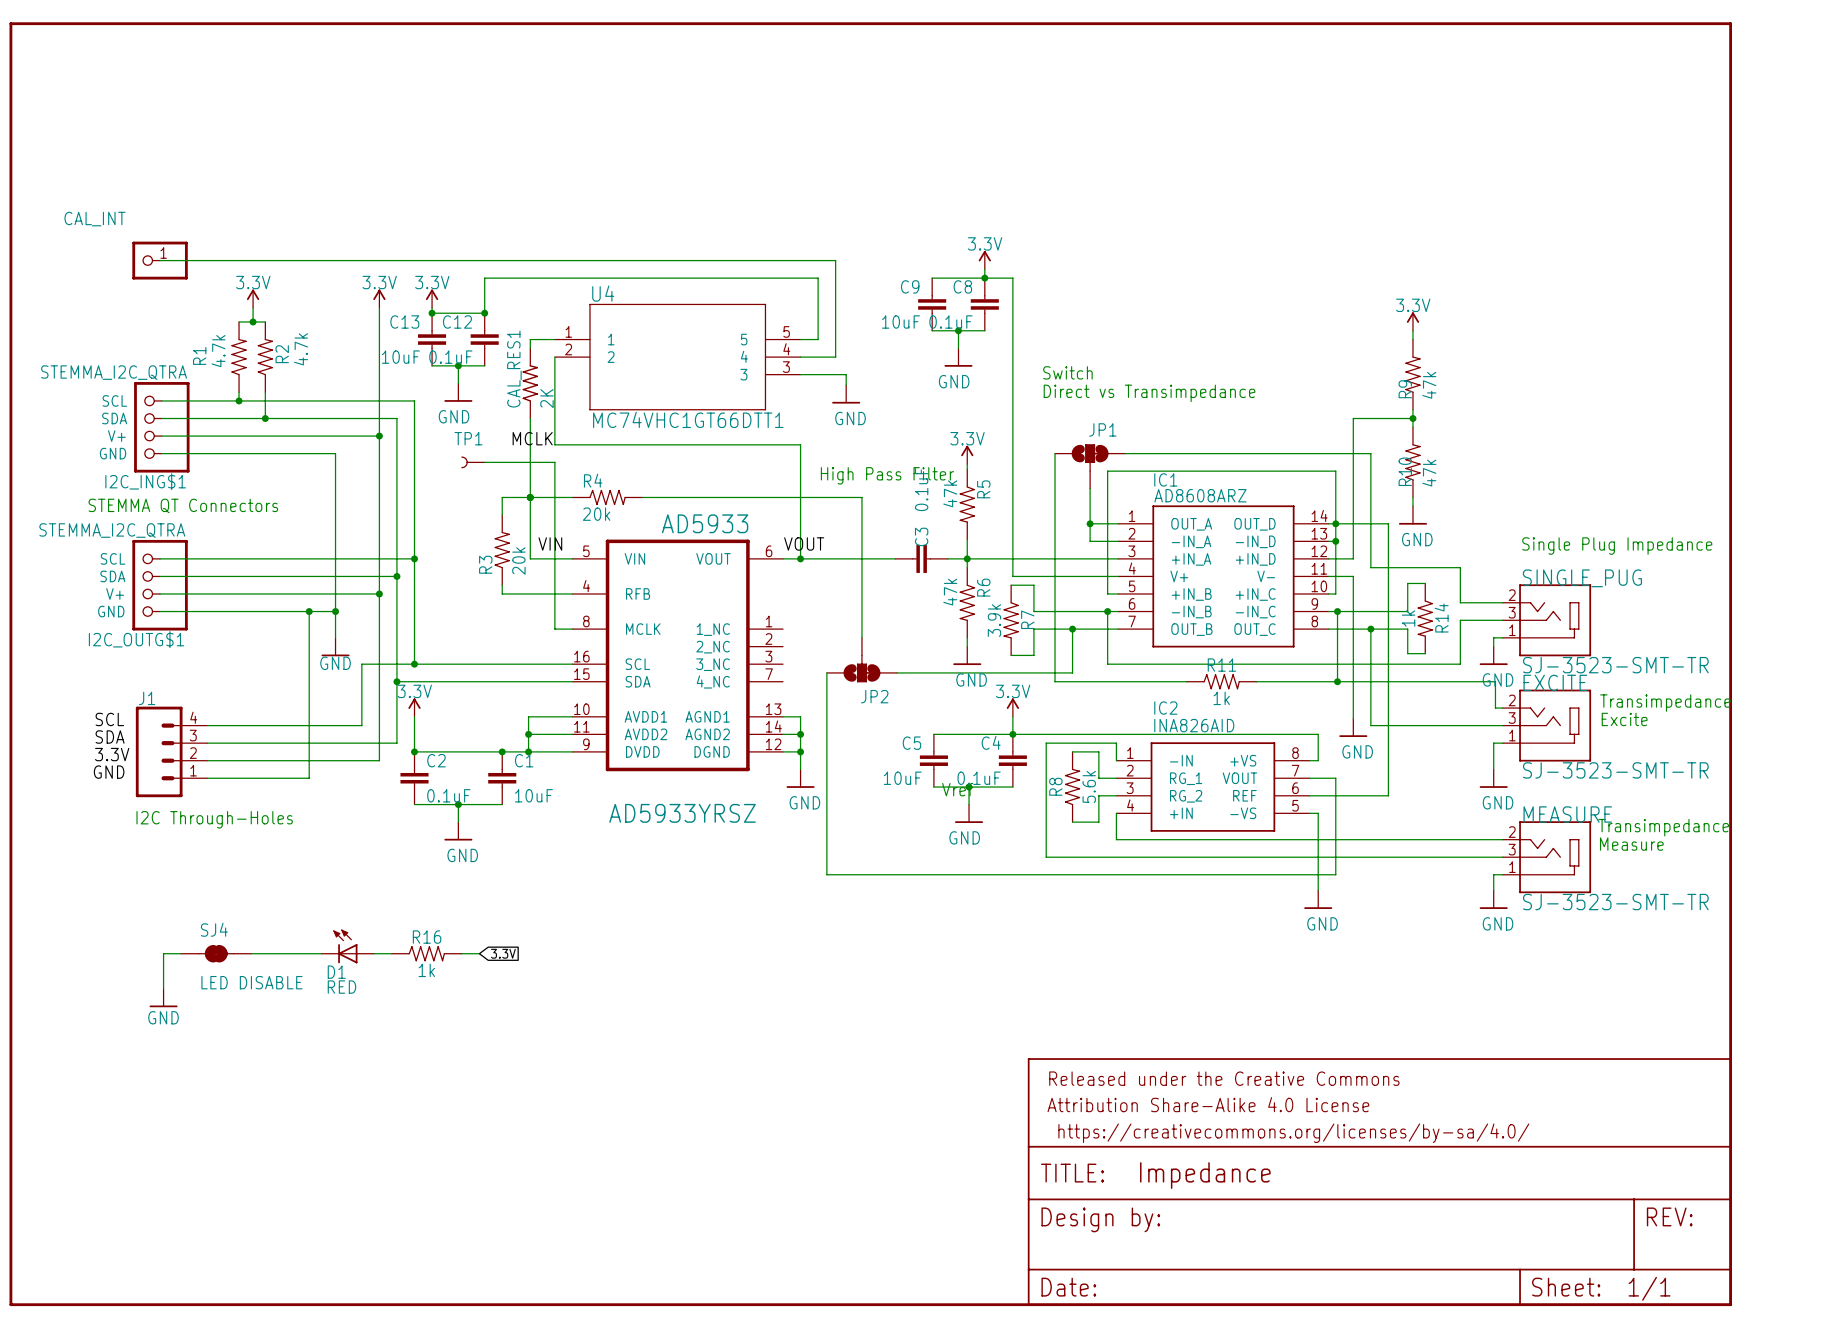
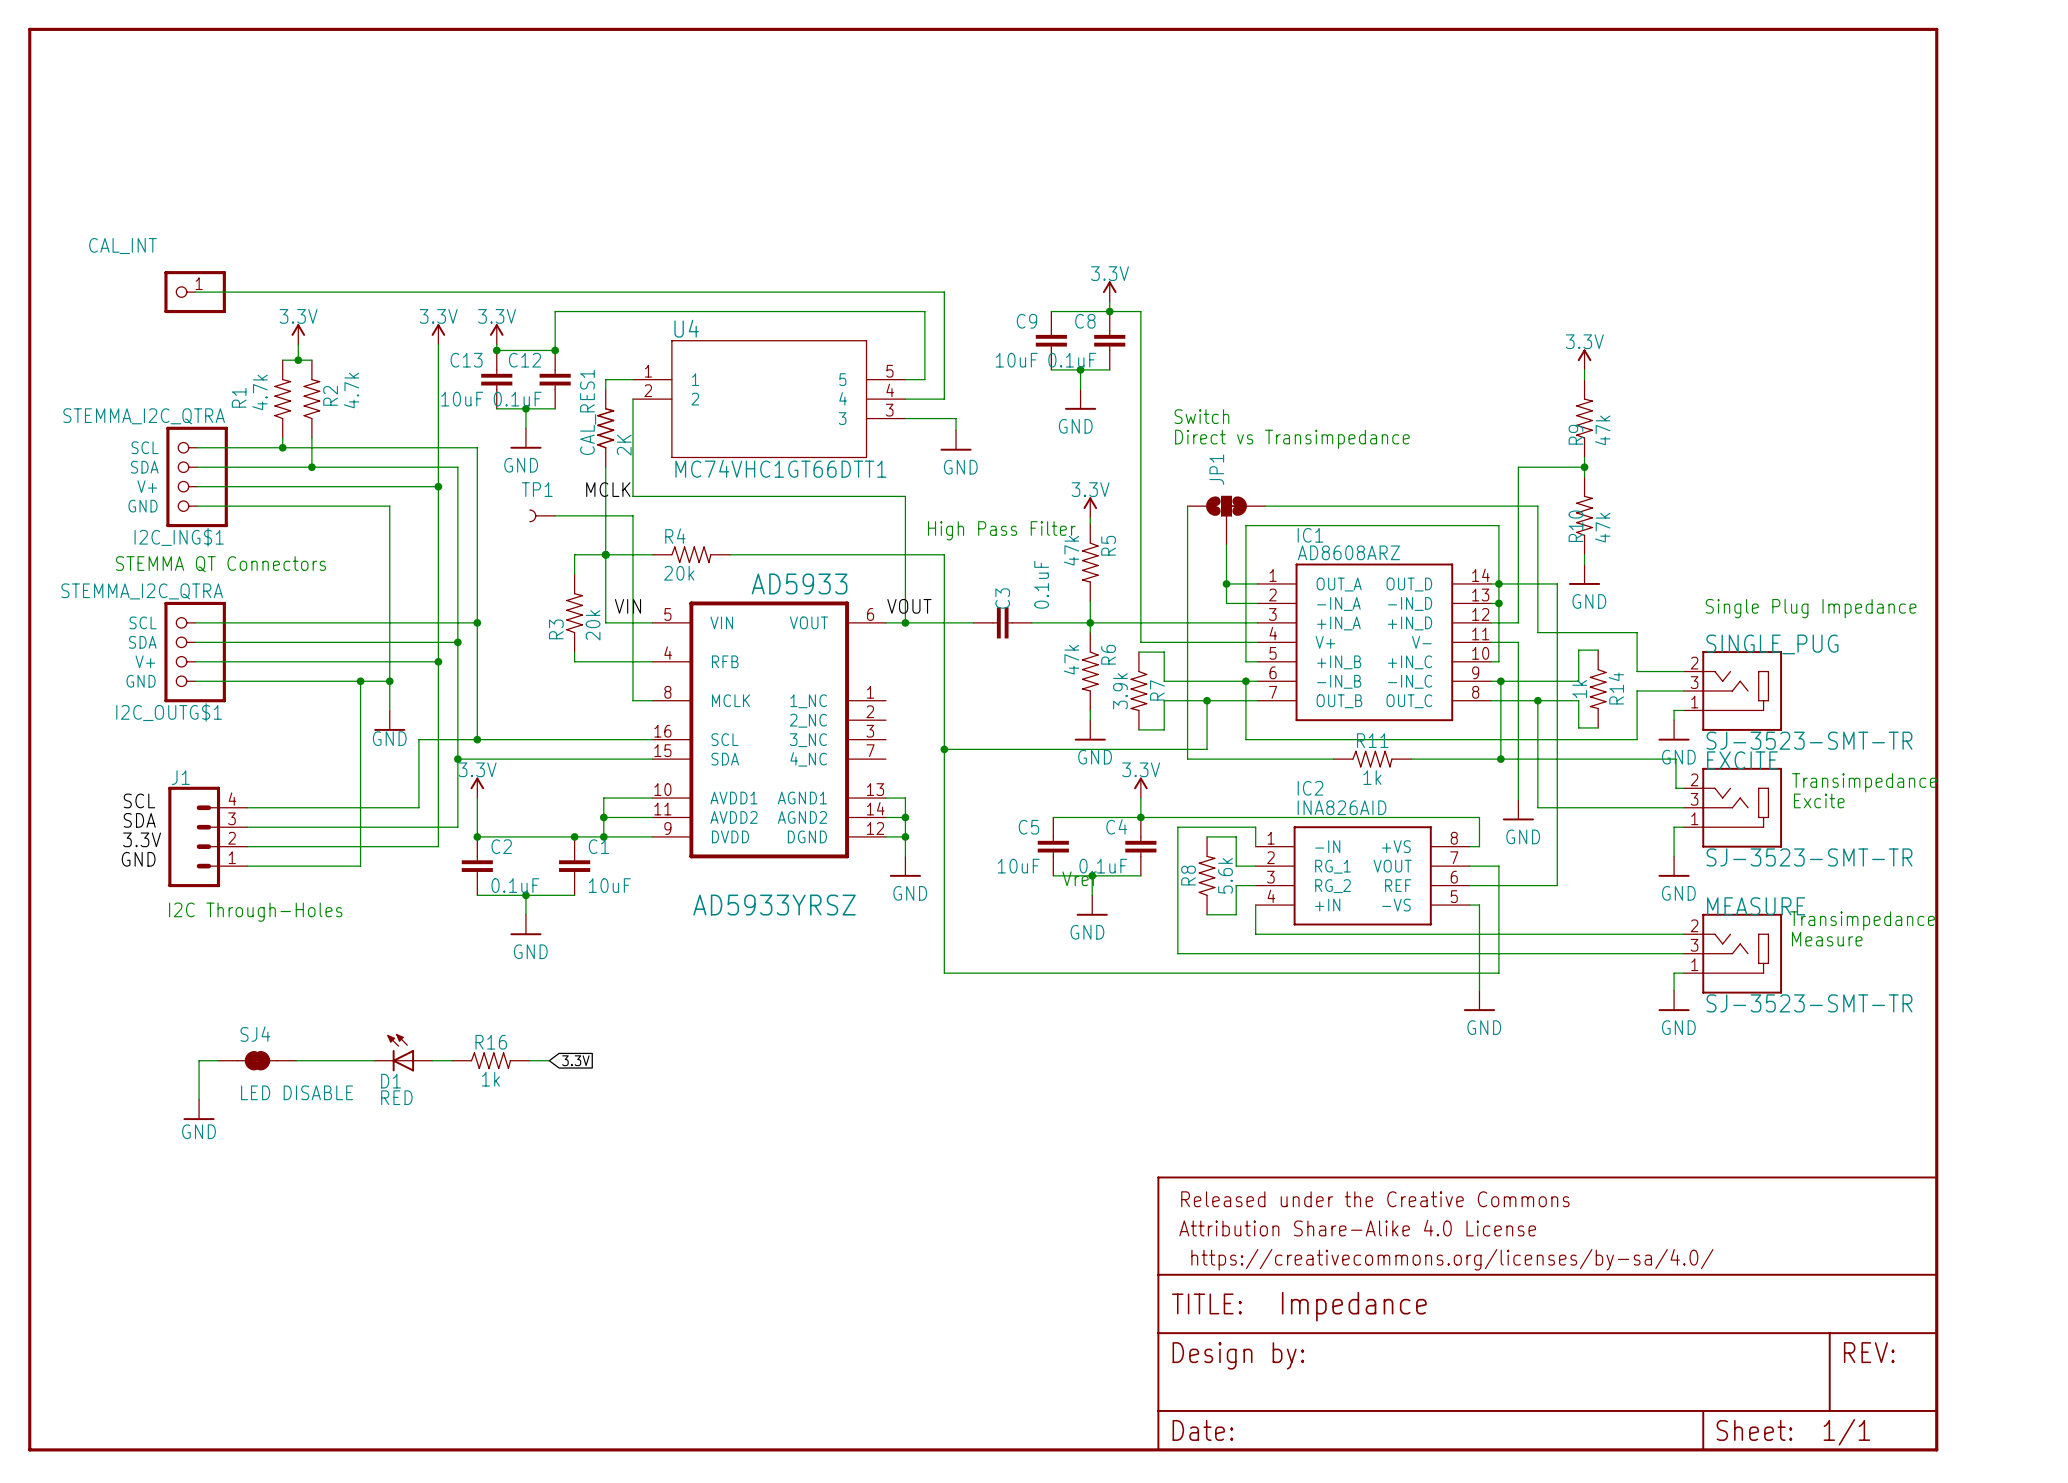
JP1 name rotation: 0° (1102, 429) -> 90° counterclockwise (1216, 469)
C3 value position: 0.1uF (921, 489) -> 0.1uF (1041, 584)
wire: (835, 497) (861, 497) (861, 637) -> none
C3 position: (921, 558) -> (1002, 622)
JP2: (861, 660) -> none
wire: (826, 672) (826, 874) (835, 874) -> (944, 554) (944, 973)
junction: none -> (944, 749)

